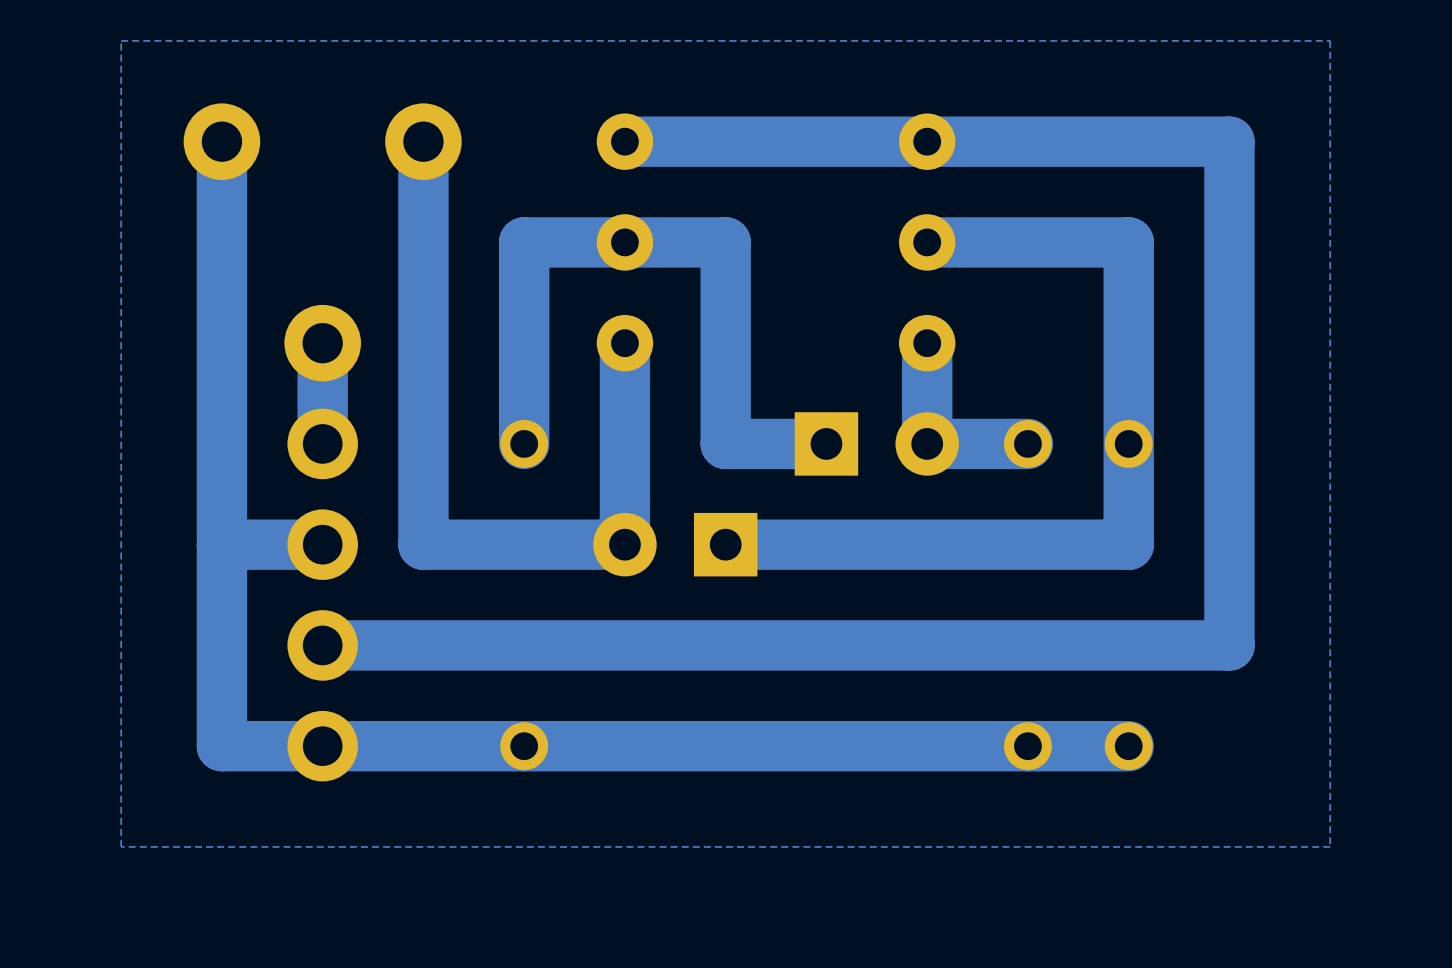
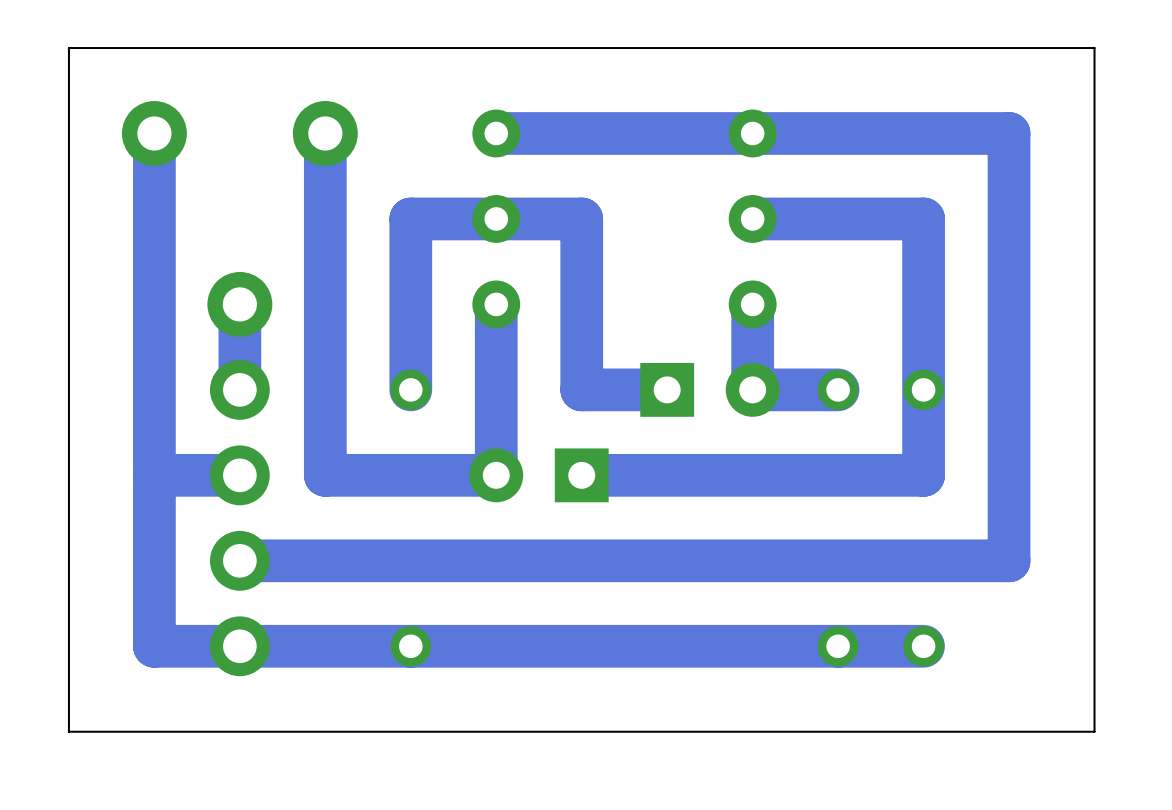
bottom zone outline: (1330, 40) (1330, 846) (121, 846) (121, 40) (1330, 40) -> none
board edge: none -> (1094, 48) (68, 48) (68, 731) (1094, 731) (1094, 48)

